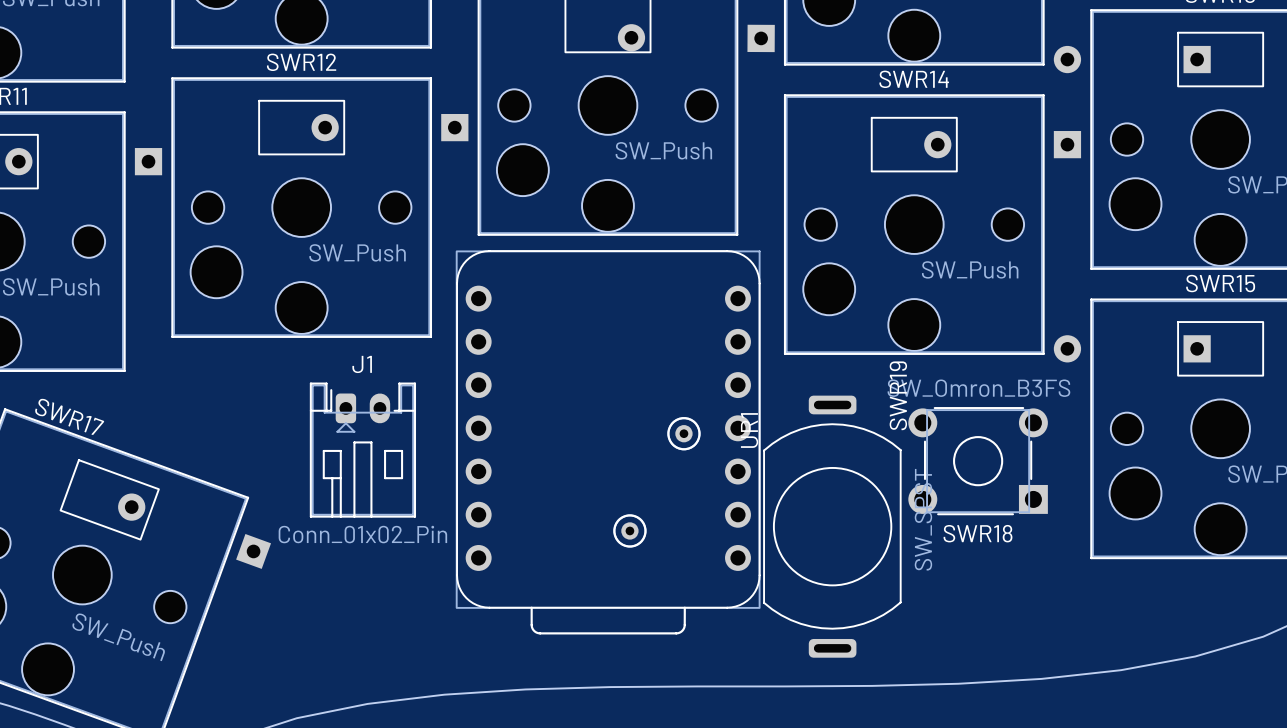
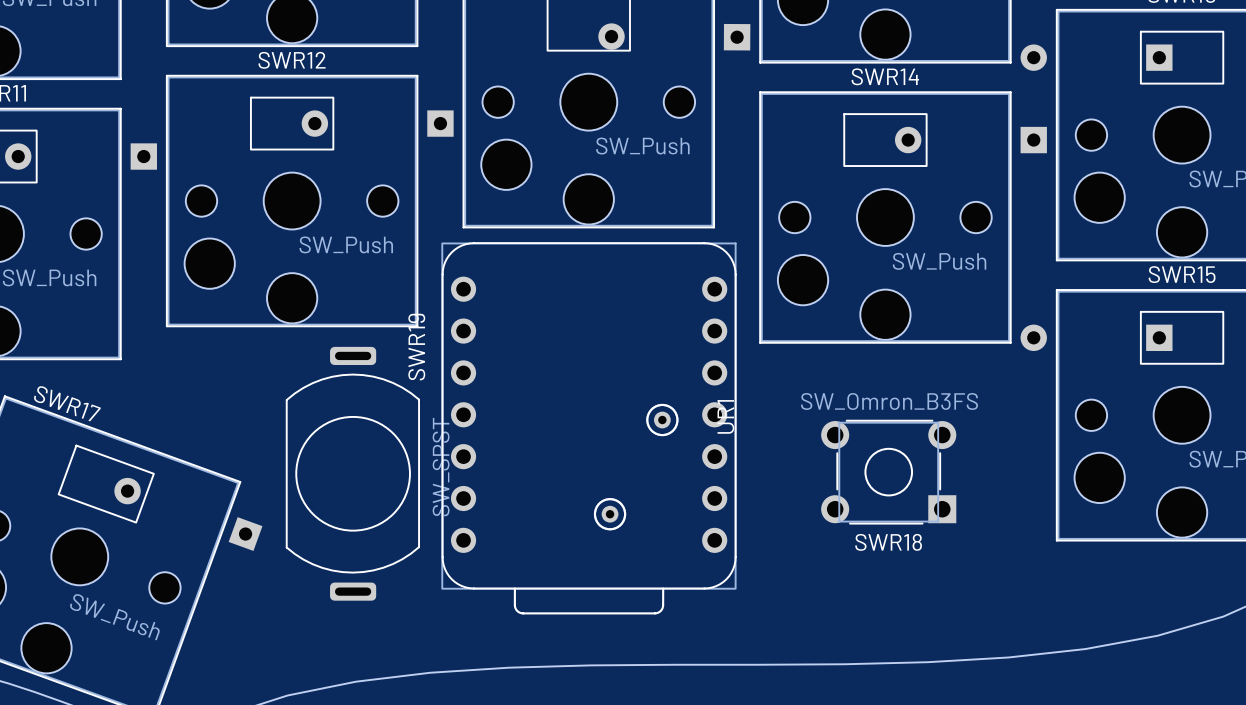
J1: Conn_01x02_Pin (362, 450) -> none
SWR18 position: (978, 461) -> (888, 472)
SWR19 position: (832, 526) -> (352, 473)

